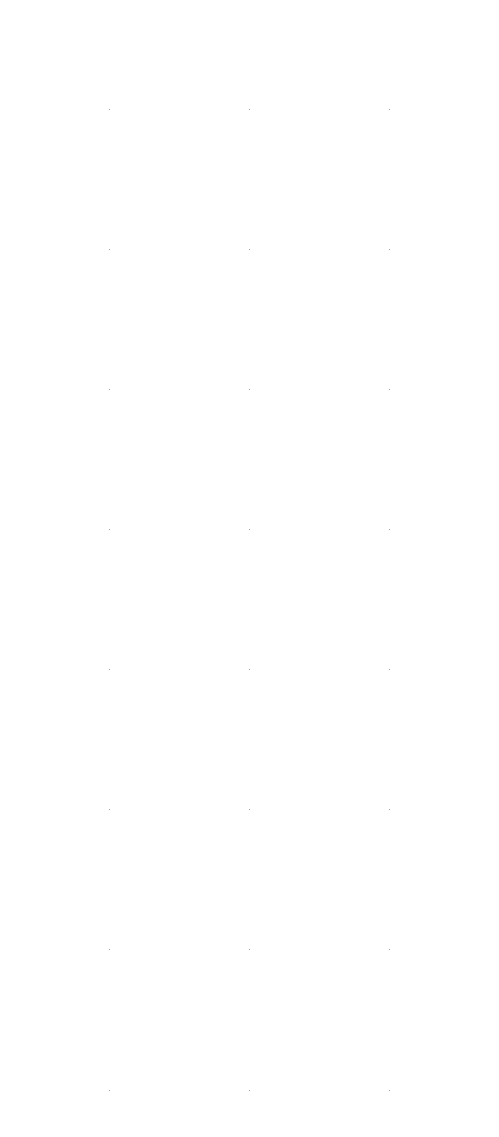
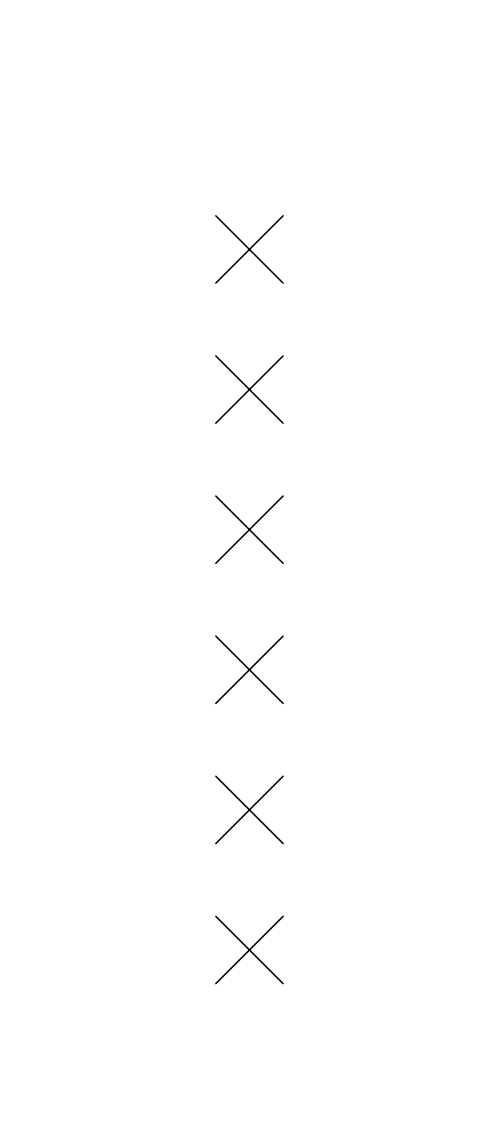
no-connect mark: none -> (249, 249)
no-connect mark: none -> (249, 389)
no-connect mark: none -> (249, 529)
no-connect mark: none -> (249, 669)
no-connect mark: none -> (249, 809)
no-connect mark: none -> (249, 949)

